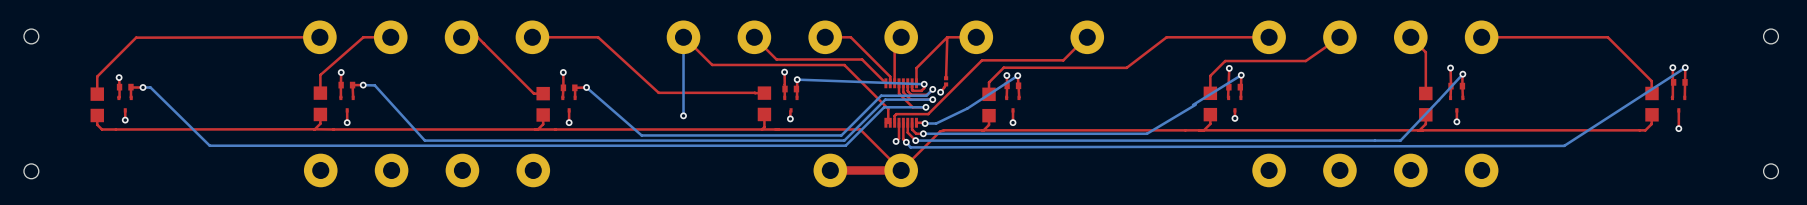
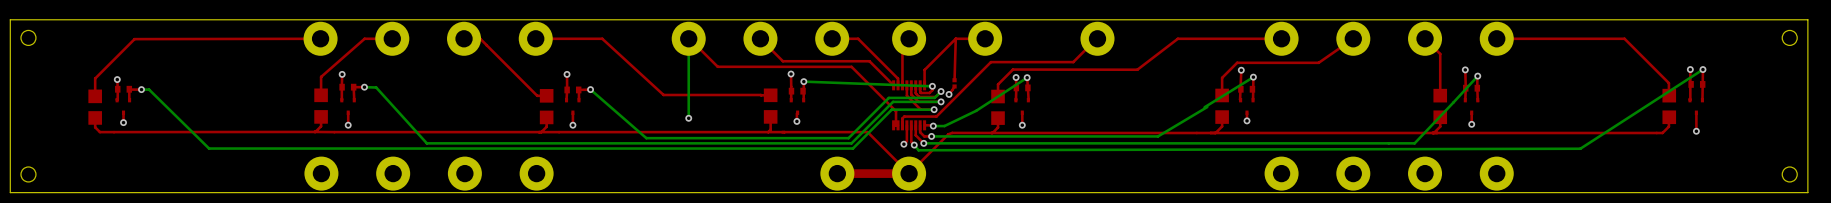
board edge: none -> (1807, 19) (1807, 192) (10, 192) (10, 19) (1807, 19)

